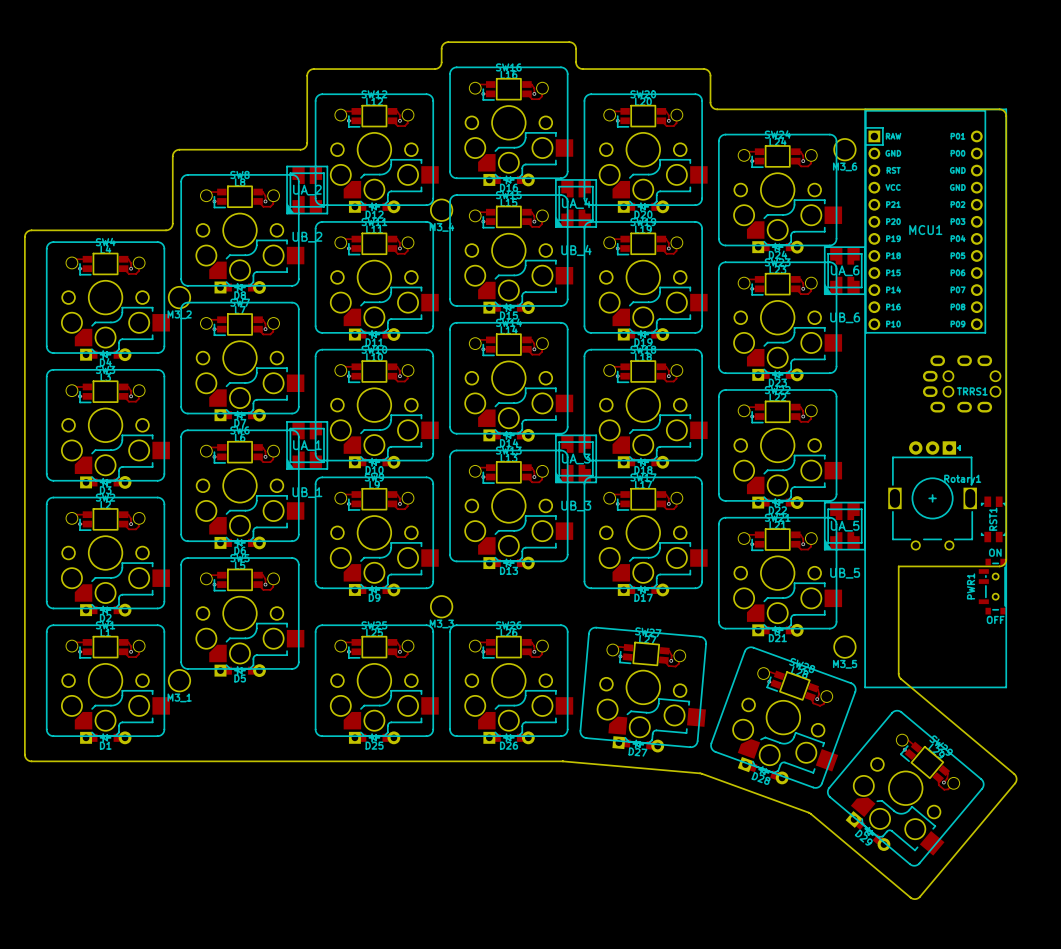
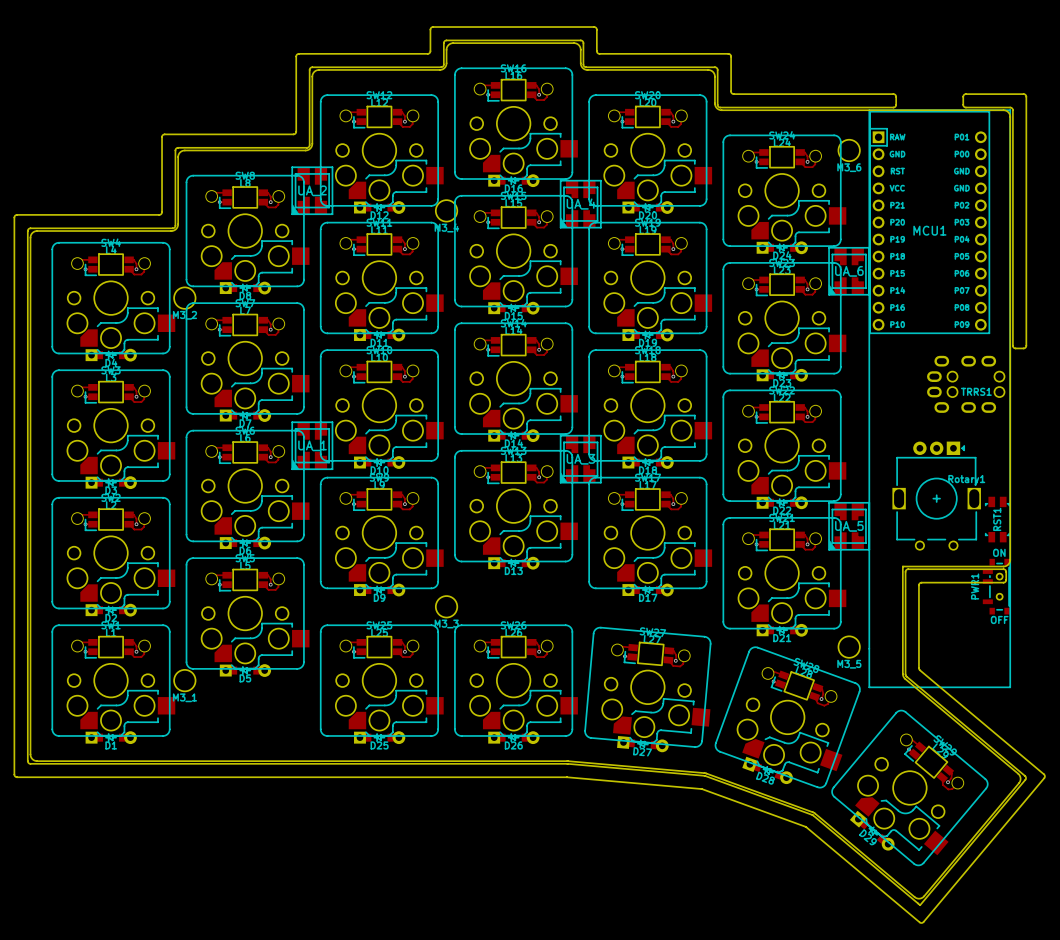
board edge: none -> (433, 27) (594, 27) (596, 29) (596, 51) (598, 53) (729, 54) (731, 56) (731, 91) (733, 94) (893, 94) (896, 96) (896, 105) (893, 107) (719, 107) (717, 105) (717, 69) (715, 67) (585, 67) (583, 64) (583, 42) (581, 40) (446, 40) (443, 42) (443, 64) (441, 67) (310, 67) (309, 145) (307, 147) (176, 148) (175, 225) (173, 228) (28, 228) (28, 762) (567, 763) (704, 775) (812, 815) (920, 905) (1026, 777) (905, 675) (905, 571) (908, 569) (1004, 569) (1006, 571) (1006, 579) (1003, 582) (919, 583) (919, 668) (1044, 776) (922, 922) (919, 922) (805, 826) (701, 789) (566, 777) (14, 775) (14, 216) (160, 214) (162, 212) (163, 134) (294, 134) (296, 131) (297, 54) (428, 53) (430, 51) (430, 29) (433, 27)
board edge: none -> (965, 94) (1023, 94) (1026, 96) (1026, 345) (1024, 348) (1014, 348) (1012, 345) (1012, 109) (1010, 107) (965, 107) (963, 105) (963, 96) (965, 94)
UB_2: (307, 237) -> none
UB_4: (576, 250) -> none
UB_6: (845, 317) -> none
UB_1: (307, 492) -> none
UB_3: (576, 506) -> none
UB_5: (845, 573) -> none

